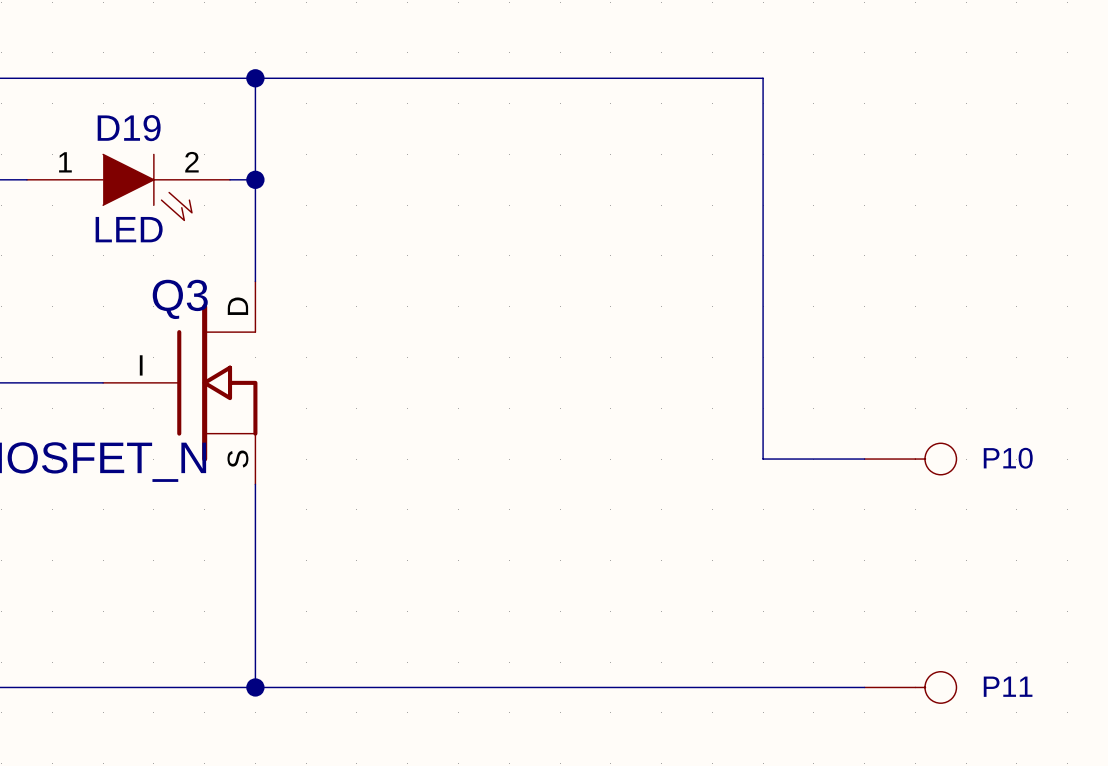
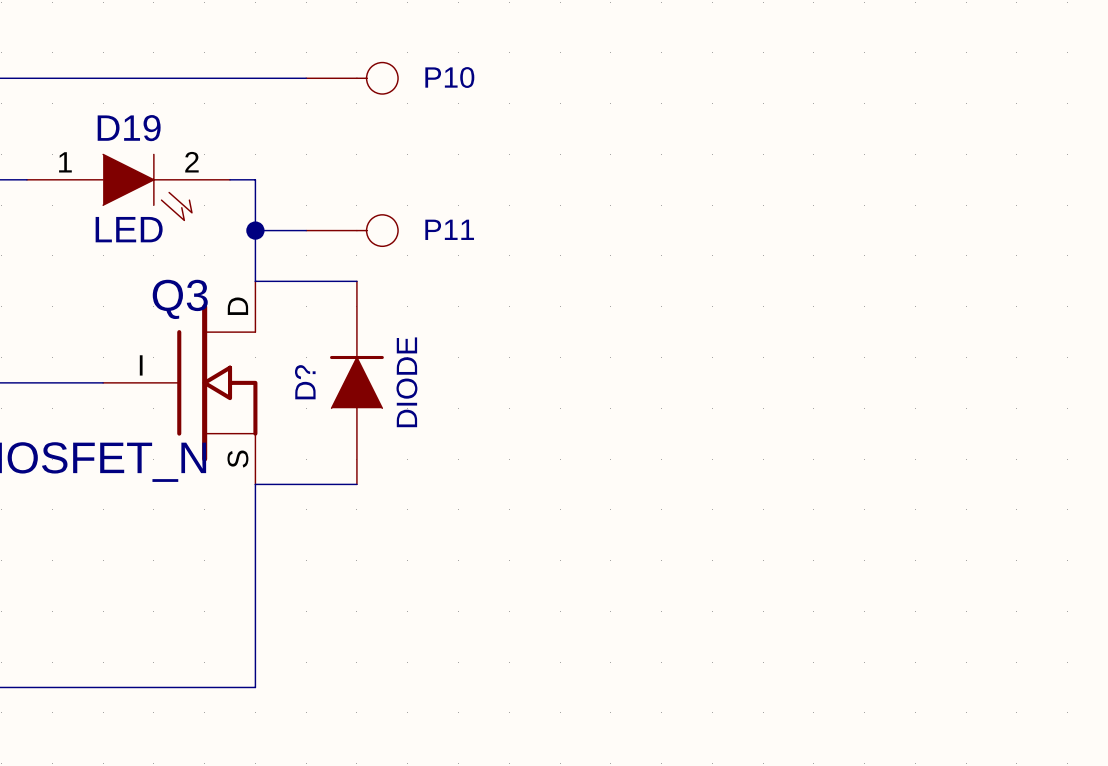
wire: (255, 78) (255, 179) -> none
junction: (255, 78) -> none
wire: (306, 78) (763, 78) (763, 459) (864, 459) -> none
junction position: (255, 179) -> (255, 230)
wire: none -> (255, 230) (306, 230)
wire: none -> (255, 281) (356, 281)
D?: none -> DIODE (356, 382)
P10 position: (910, 459) -> (352, 78)
wire: none -> (255, 484) (356, 484)
wire: (255, 687) (864, 687) -> none
junction: (255, 687) -> none
P11 position: (910, 687) -> (352, 230)

